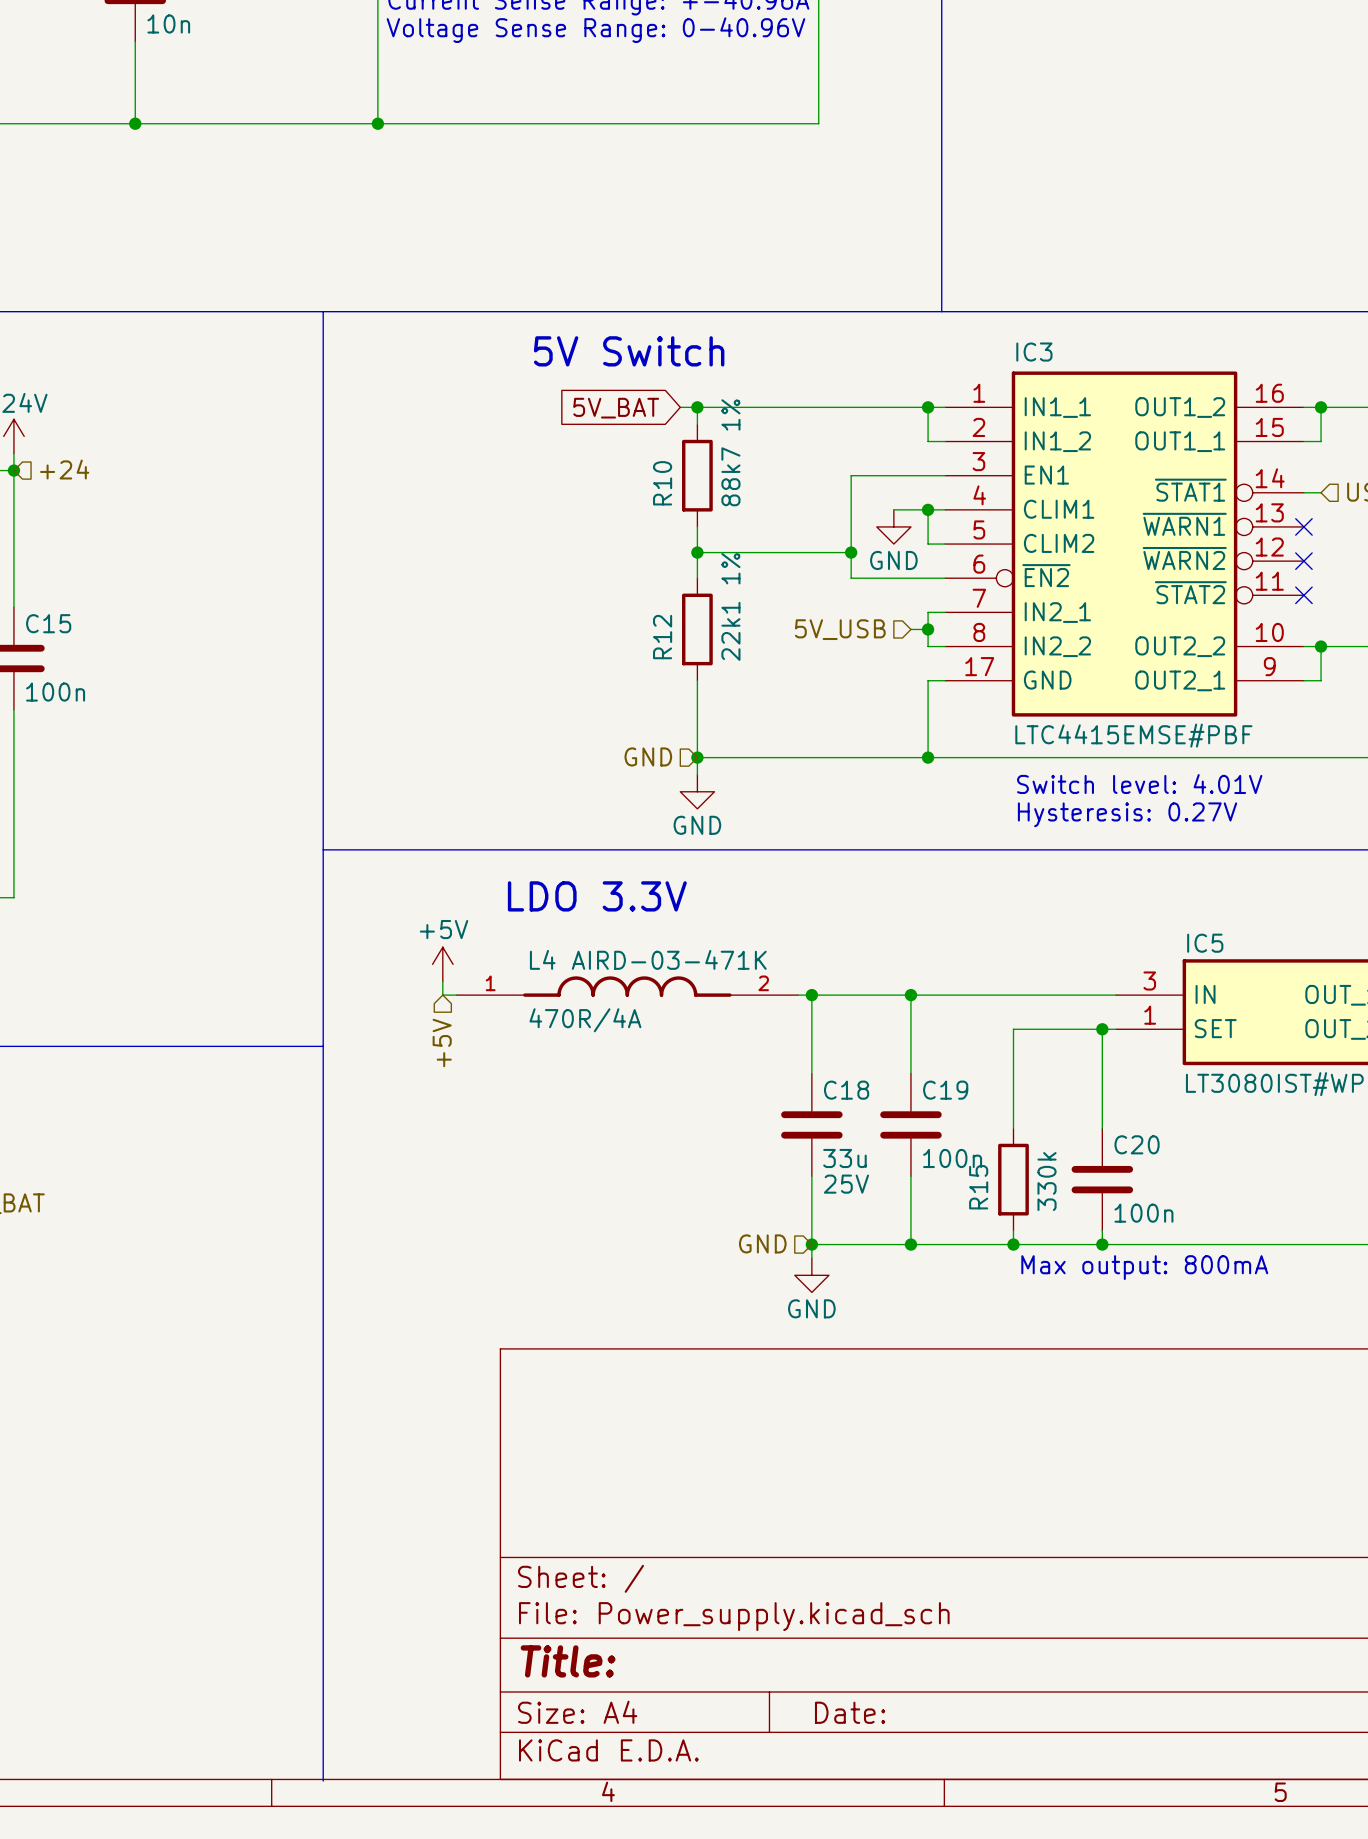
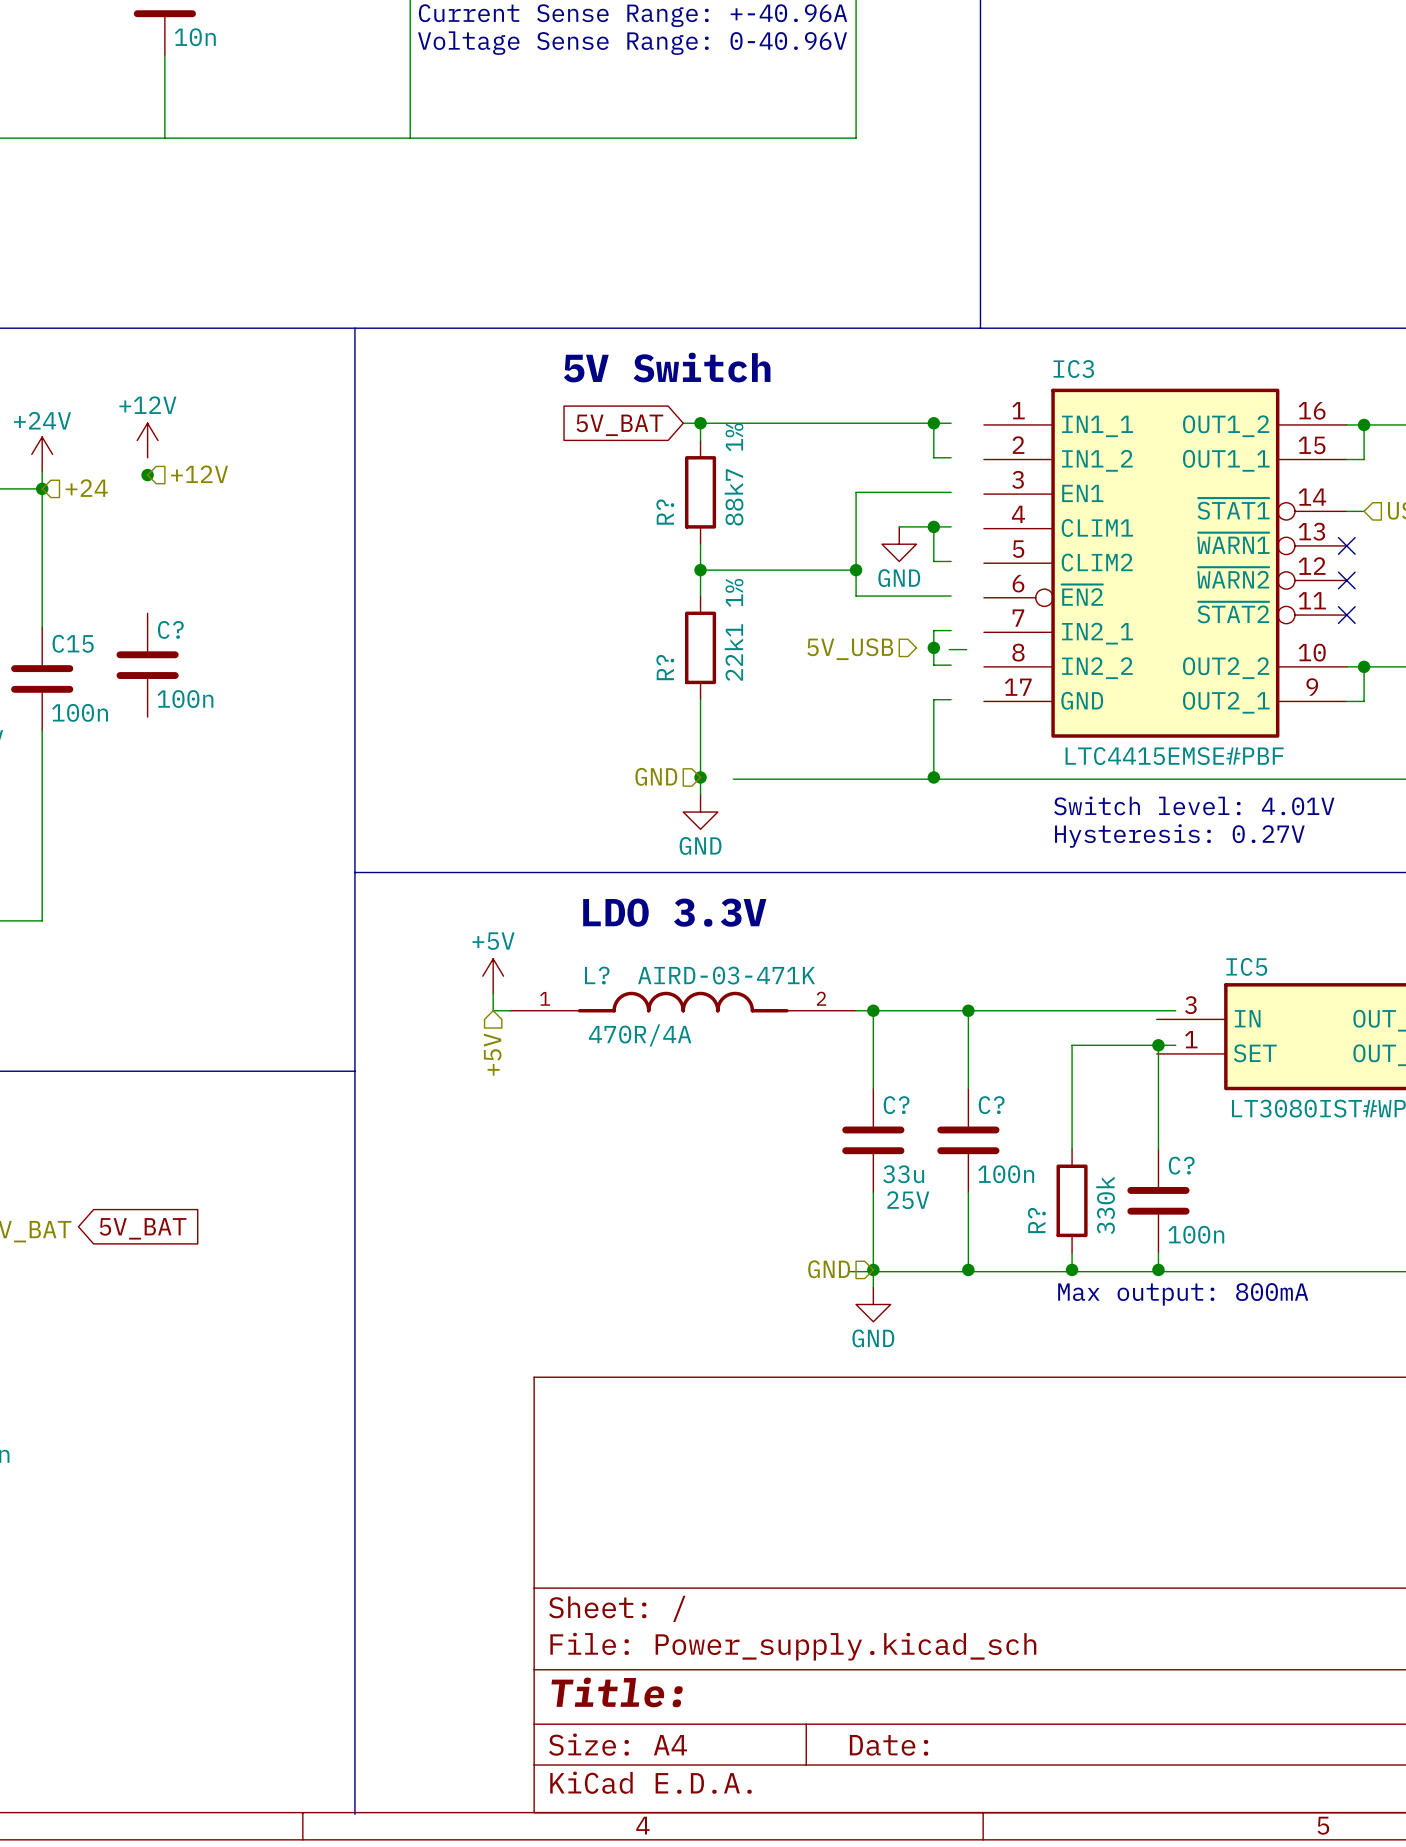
junction: (135, 123) -> none
junction: (377, 123) -> none
wire: (680, 407) (945, 407) -> (683, 423) (951, 423)
wire: (697, 407) (697, 424) -> (700, 423) (700, 440)
junction position: (697, 407) -> (700, 423)
wire: (928, 407) (928, 441) (945, 441) -> (933, 423) (933, 457) (951, 457)
junction position: (928, 407) -> (933, 423)
global label position: 5V_BAT (616, 408) -> 5V_BAT (619, 425)
power symbol: none -> +12V (147, 440)
junction: none -> (147, 475)
hierarchical label: none -> +12V (199, 474)
R?: none -> 88k7 1% (700, 492)
R10: 88k7 1% (697, 475) -> none
wire: (945, 475) (851, 475) (851, 578) (945, 578) -> (951, 492) (856, 492) (856, 596) (951, 596)
junction: none -> (933, 526)
wire: (893, 509) (945, 509) -> (899, 526) (951, 526)
wire: (928, 509) (928, 544) (945, 544) -> (933, 526) (933, 561) (951, 561)
junction: (928, 509) -> none
wire: (697, 526) (697, 578) -> (700, 544) (700, 596)
power symbol position: GND (893, 526) -> GND (899, 544)
junction: none -> (856, 570)
wire: (697, 552) (851, 552) -> (700, 570) (856, 570)
junction position: (697, 552) -> (700, 570)
junction: (851, 552) -> none
wire: (945, 612) (928, 612) (928, 646) (945, 646) -> (951, 630) (933, 630) (933, 665) (951, 665)
R?: none -> 22k1 1% (700, 647)
R12: 22k1 1% (697, 629) -> none
hierarchical label position: 5V_USB (840, 629) -> 5V_USB (850, 649)
junction position: (928, 629) -> (933, 647)
C?: none -> 100n (147, 665)
wire: (697, 680) (697, 774) -> (700, 699) (700, 794)
wire: (945, 680) (928, 680) (928, 757) -> (951, 699) (933, 699) (933, 777)
hierarchical label position: GND (648, 756) -> GND (656, 776)
junction position: (697, 757) -> (700, 777)
junction position: (928, 757) -> (933, 777)
power symbol position: GND (697, 791) -> GND (700, 812)
text position: LDO 3.3V (597, 896) -> LDO 3.3V (674, 912)
power symbol position: +5V (442, 964) -> +5V (493, 976)
wire: none -> (493, 993) (493, 1010) (510, 1010)
L?: none -> AIRD-03-471K (683, 1002)
wire: (442, 981) (442, 995) (456, 995) -> none
L4: AIRD-03-471K (627, 986) -> none
wire: none -> (856, 1010) (1175, 1010)
wire: none -> (873, 1010) (873, 1088)
wire: none -> (968, 1010) (968, 1088)
wire: (798, 995) (1116, 995) -> none
wire: (811, 995) (811, 1073) -> none
junction position: (811, 995) -> (873, 1010)
wire: (910, 995) (910, 1073) -> none
junction position: (910, 995) -> (968, 1010)
wire: none -> (1158, 1045) (1158, 1148)
wire: none -> (1175, 1045) (1072, 1045) (1072, 1148)
wire: (1102, 1029) (1102, 1128) -> none
junction position: (1102, 1029) -> (1158, 1045)
wire: (1116, 1029) (1013, 1029) (1013, 1128) -> none
hierarchical label position: +5V (442, 1042) -> +5V (492, 1054)
C?: none -> 33u (873, 1140)
C?: none -> 100n (968, 1140)
C18: 33u (811, 1124) -> none
C19: 100n (910, 1124) -> none
wire: none -> (873, 1192) (873, 1287)
wire: none -> (968, 1192) (968, 1269)
R?: none -> 330k (1072, 1200)
C?: none -> 100n (1158, 1200)
wire: (811, 1176) (811, 1258) -> none
wire: (910, 1176) (910, 1244) -> none
R15: 330k (1013, 1179) -> none
C20: 100n (1102, 1179) -> none
global label: none -> 5V_BAT (143, 1228)
wire: none -> (1072, 1252) (1072, 1269)
wire: none -> (1158, 1252) (1158, 1269)
wire: (1013, 1230) (1013, 1244) -> none
wire: (1102, 1230) (1102, 1244) -> none
hierarchical label position: GND (762, 1243) -> GND (829, 1269)
junction position: (811, 1244) -> (873, 1269)
junction position: (910, 1244) -> (968, 1269)
junction position: (1013, 1244) -> (1072, 1269)
junction position: (1102, 1244) -> (1158, 1269)
power symbol position: GND (811, 1275) -> GND (873, 1304)

